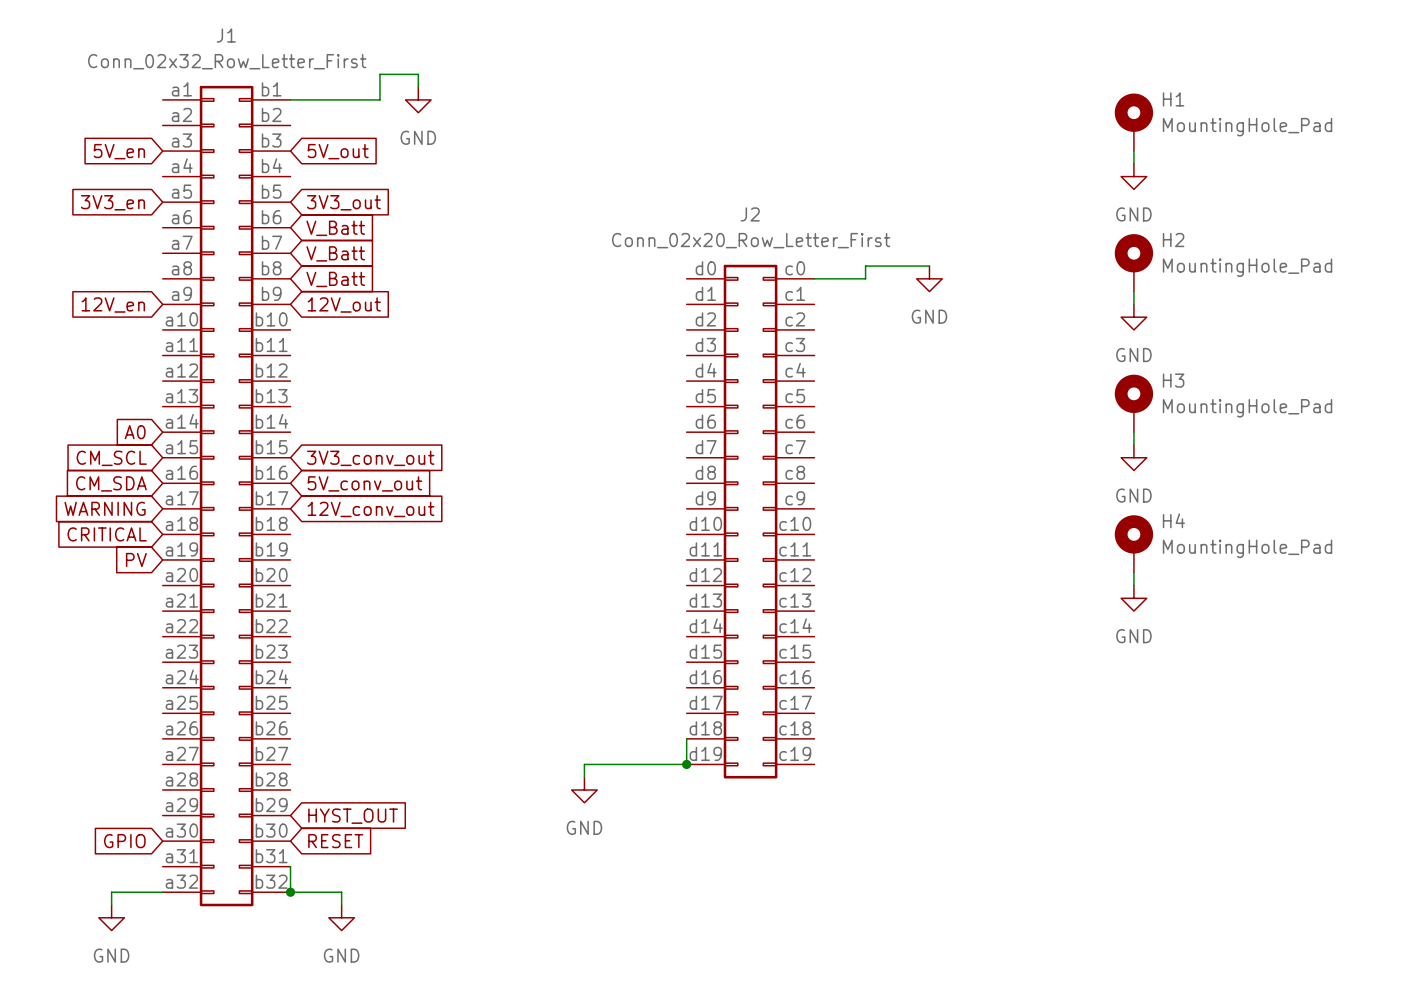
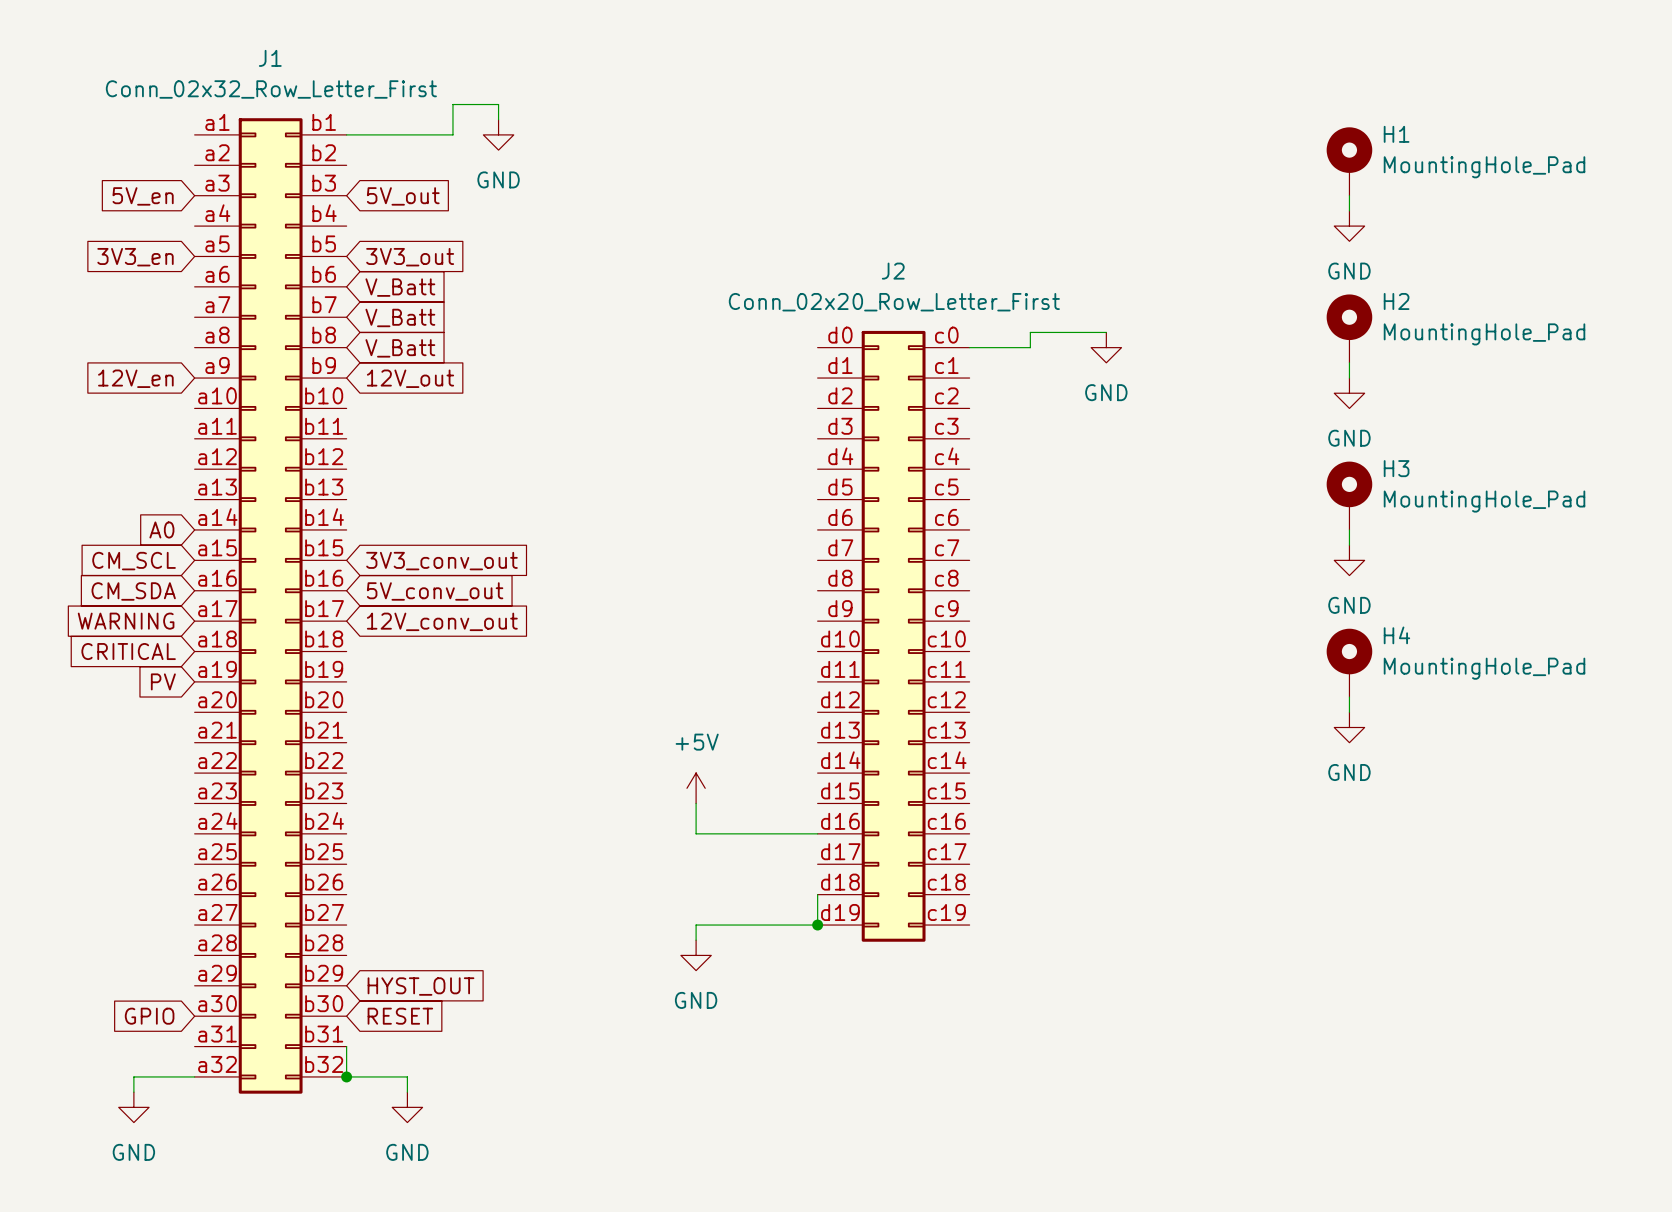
power symbol: none -> +5V (696, 788)
wire: none -> (696, 803) (696, 833) (817, 833)

